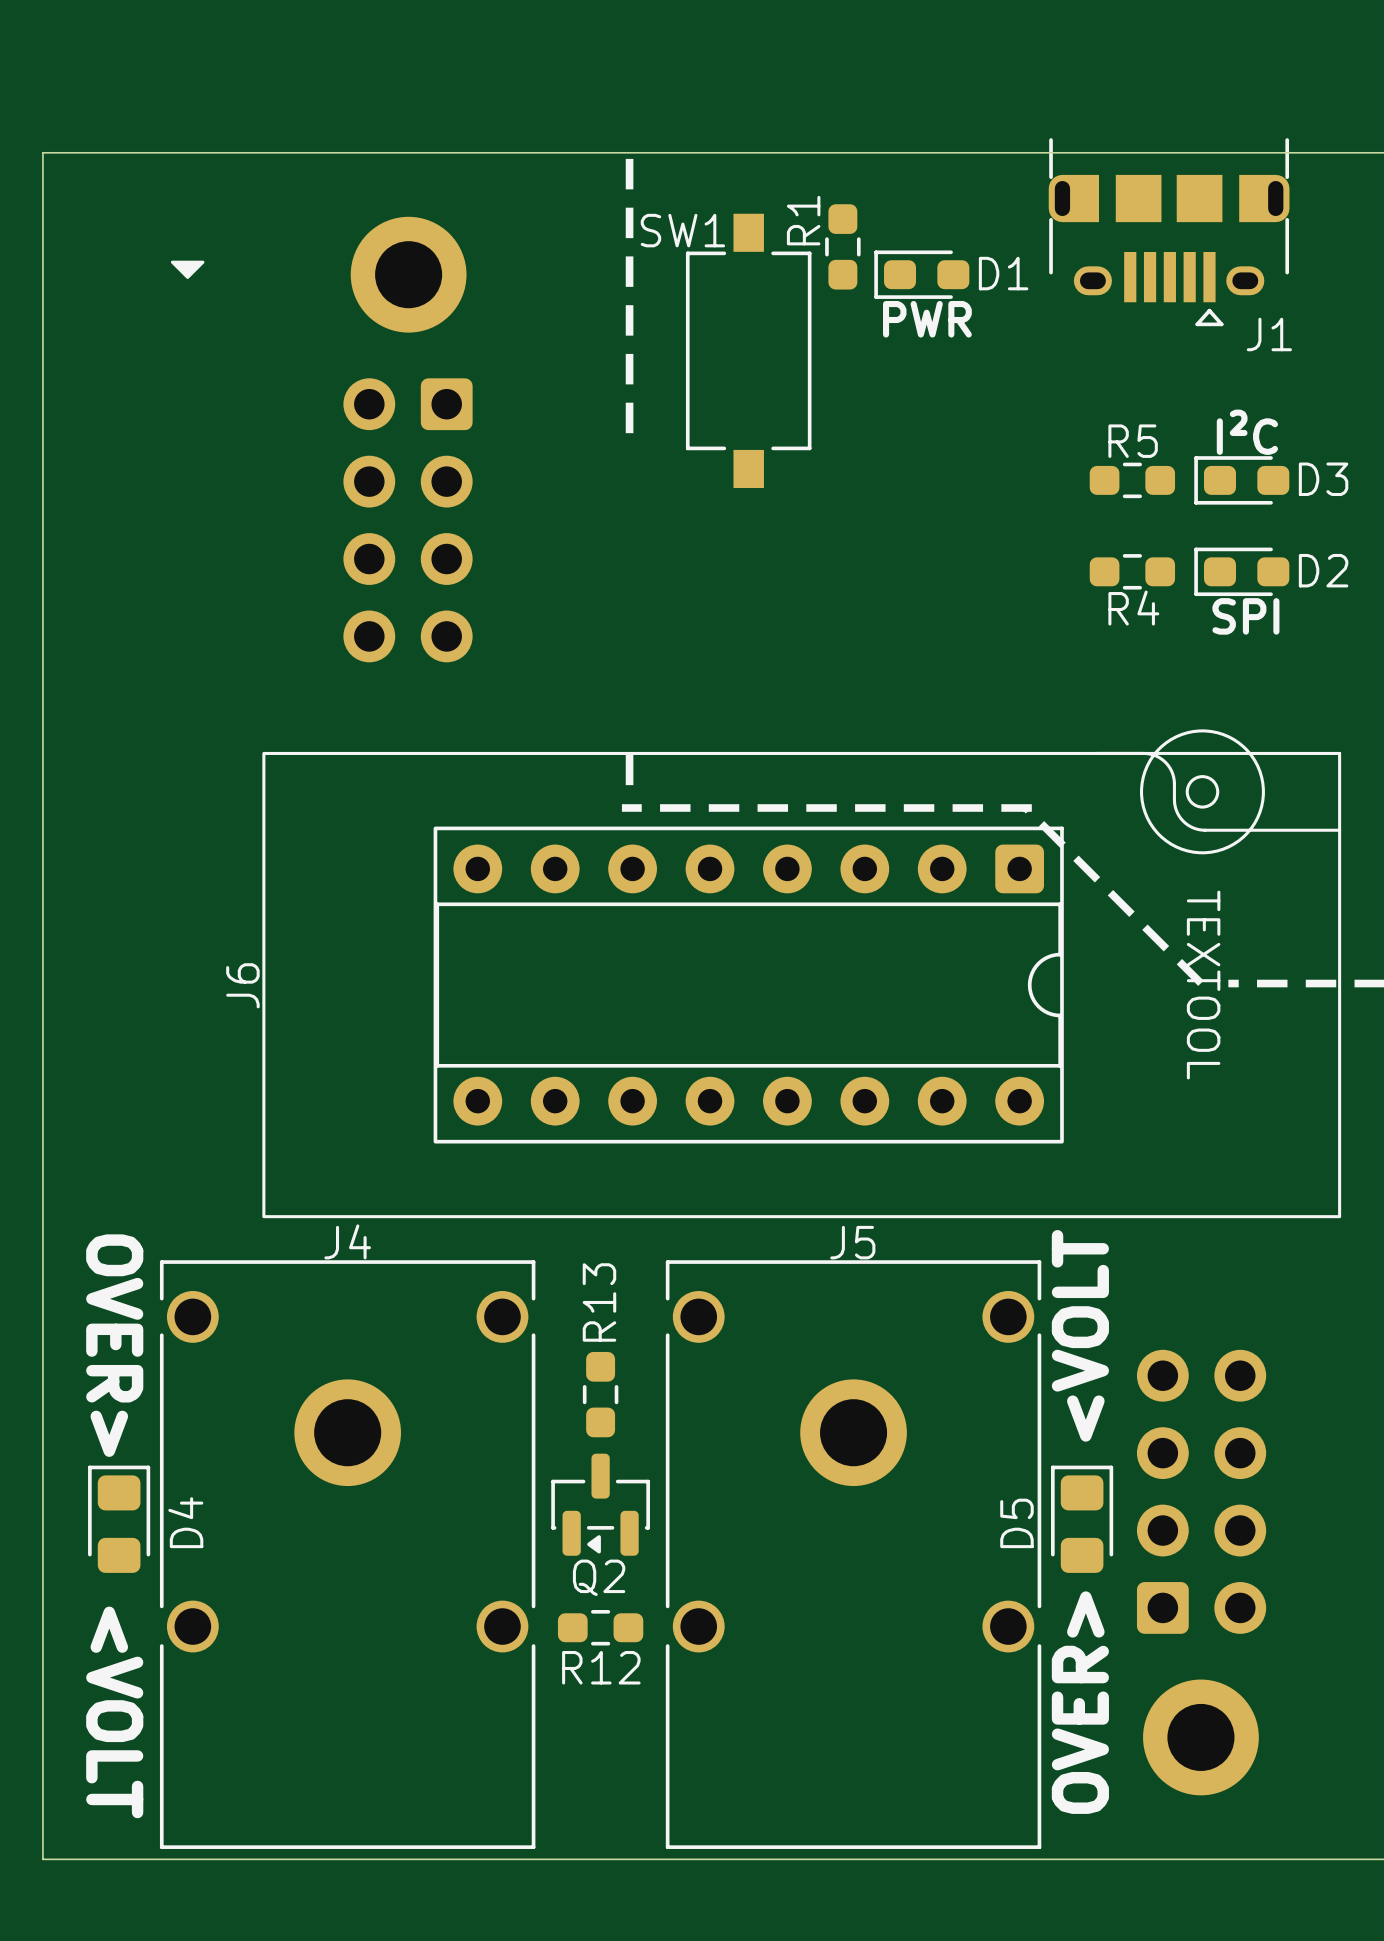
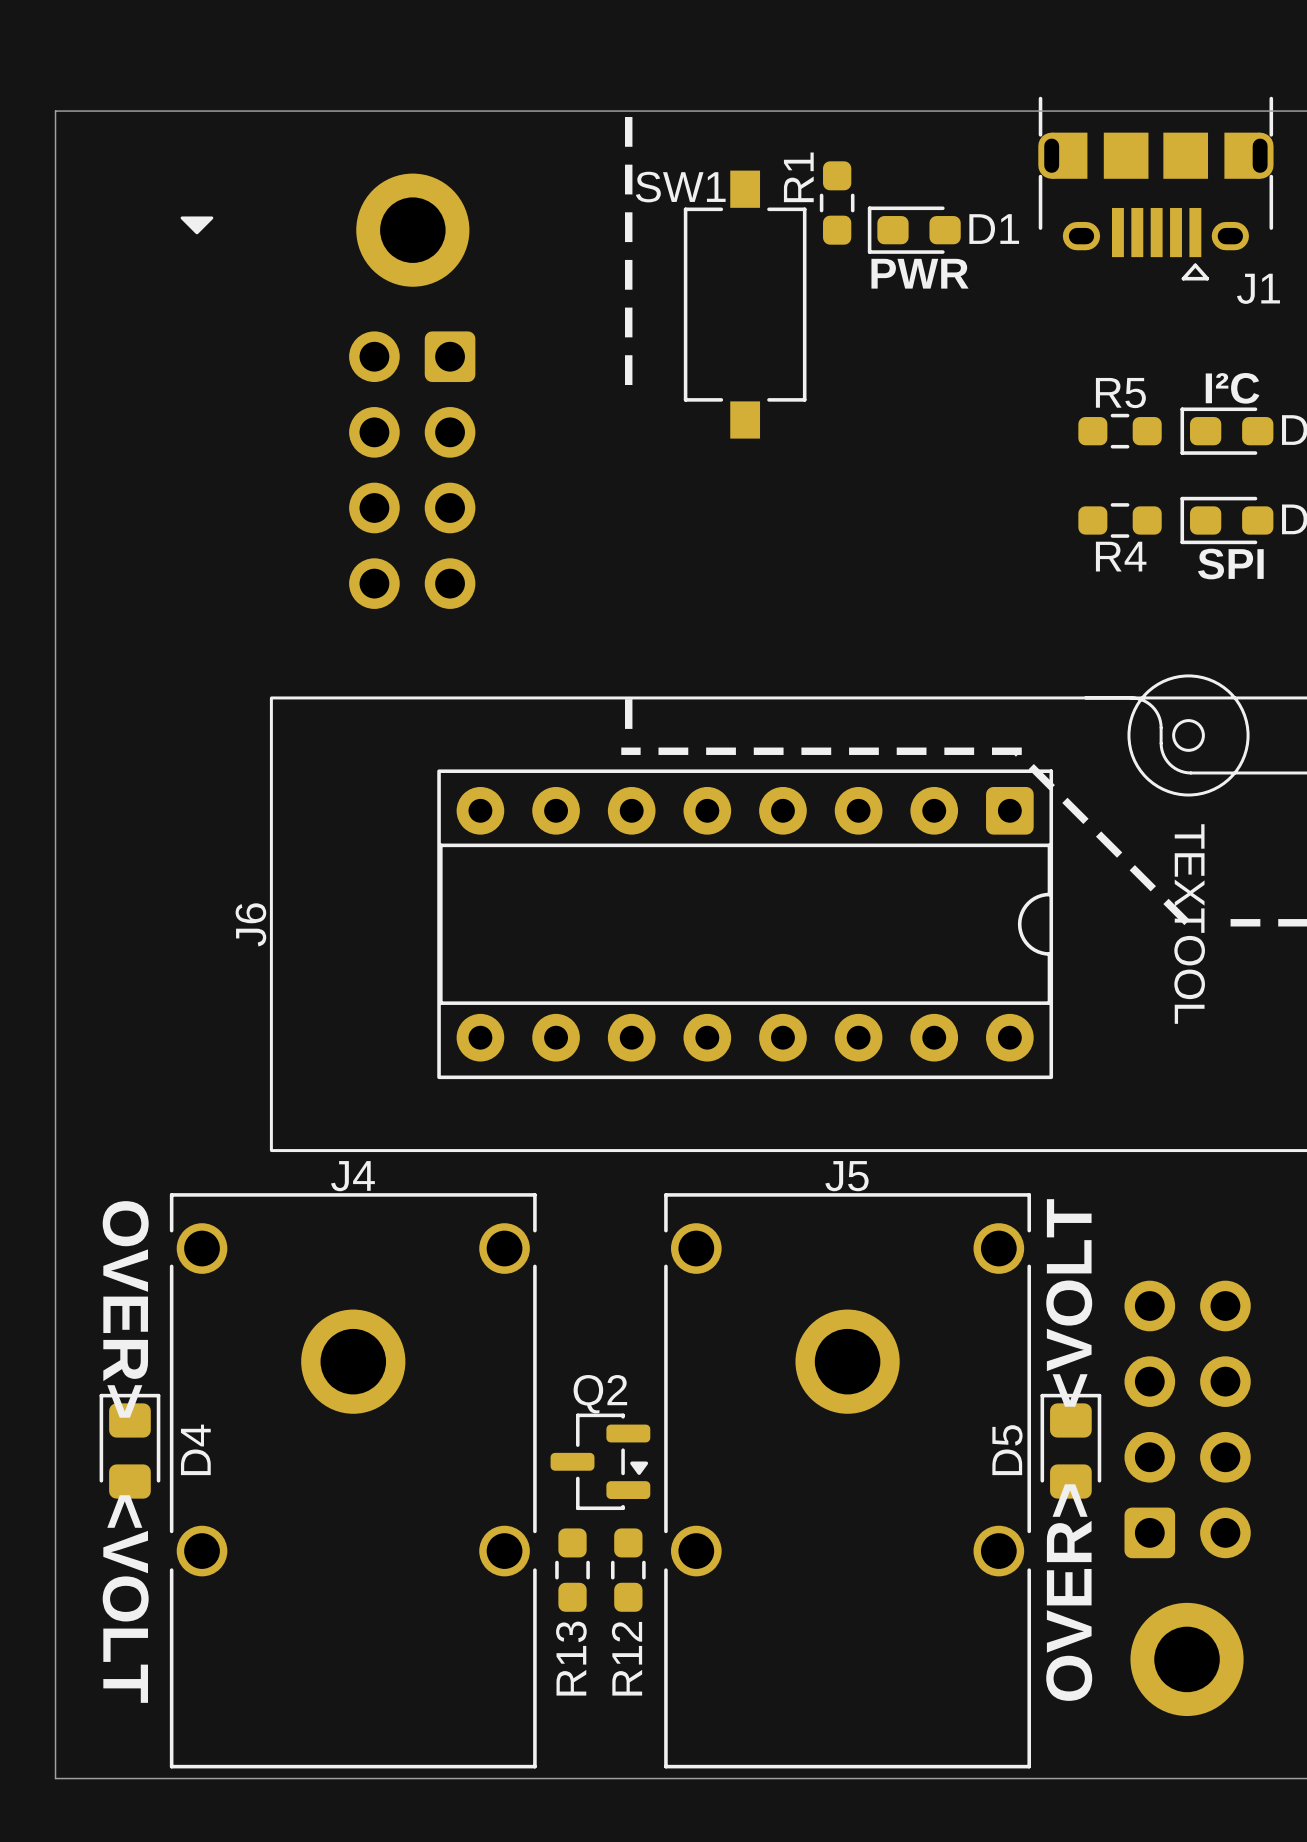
R13 name position: R13 (599, 1302) -> R13 (571, 1658)
R13 position: (600, 1394) -> (572, 1570)
Q2 rotation: 0° (600, 1504) -> 90° counterclockwise (600, 1461)
Q2 name position: Q2 (599, 1577) -> Q2 (600, 1394)
R12 rotation: 0° (600, 1627) -> 90° clockwise (628, 1570)

